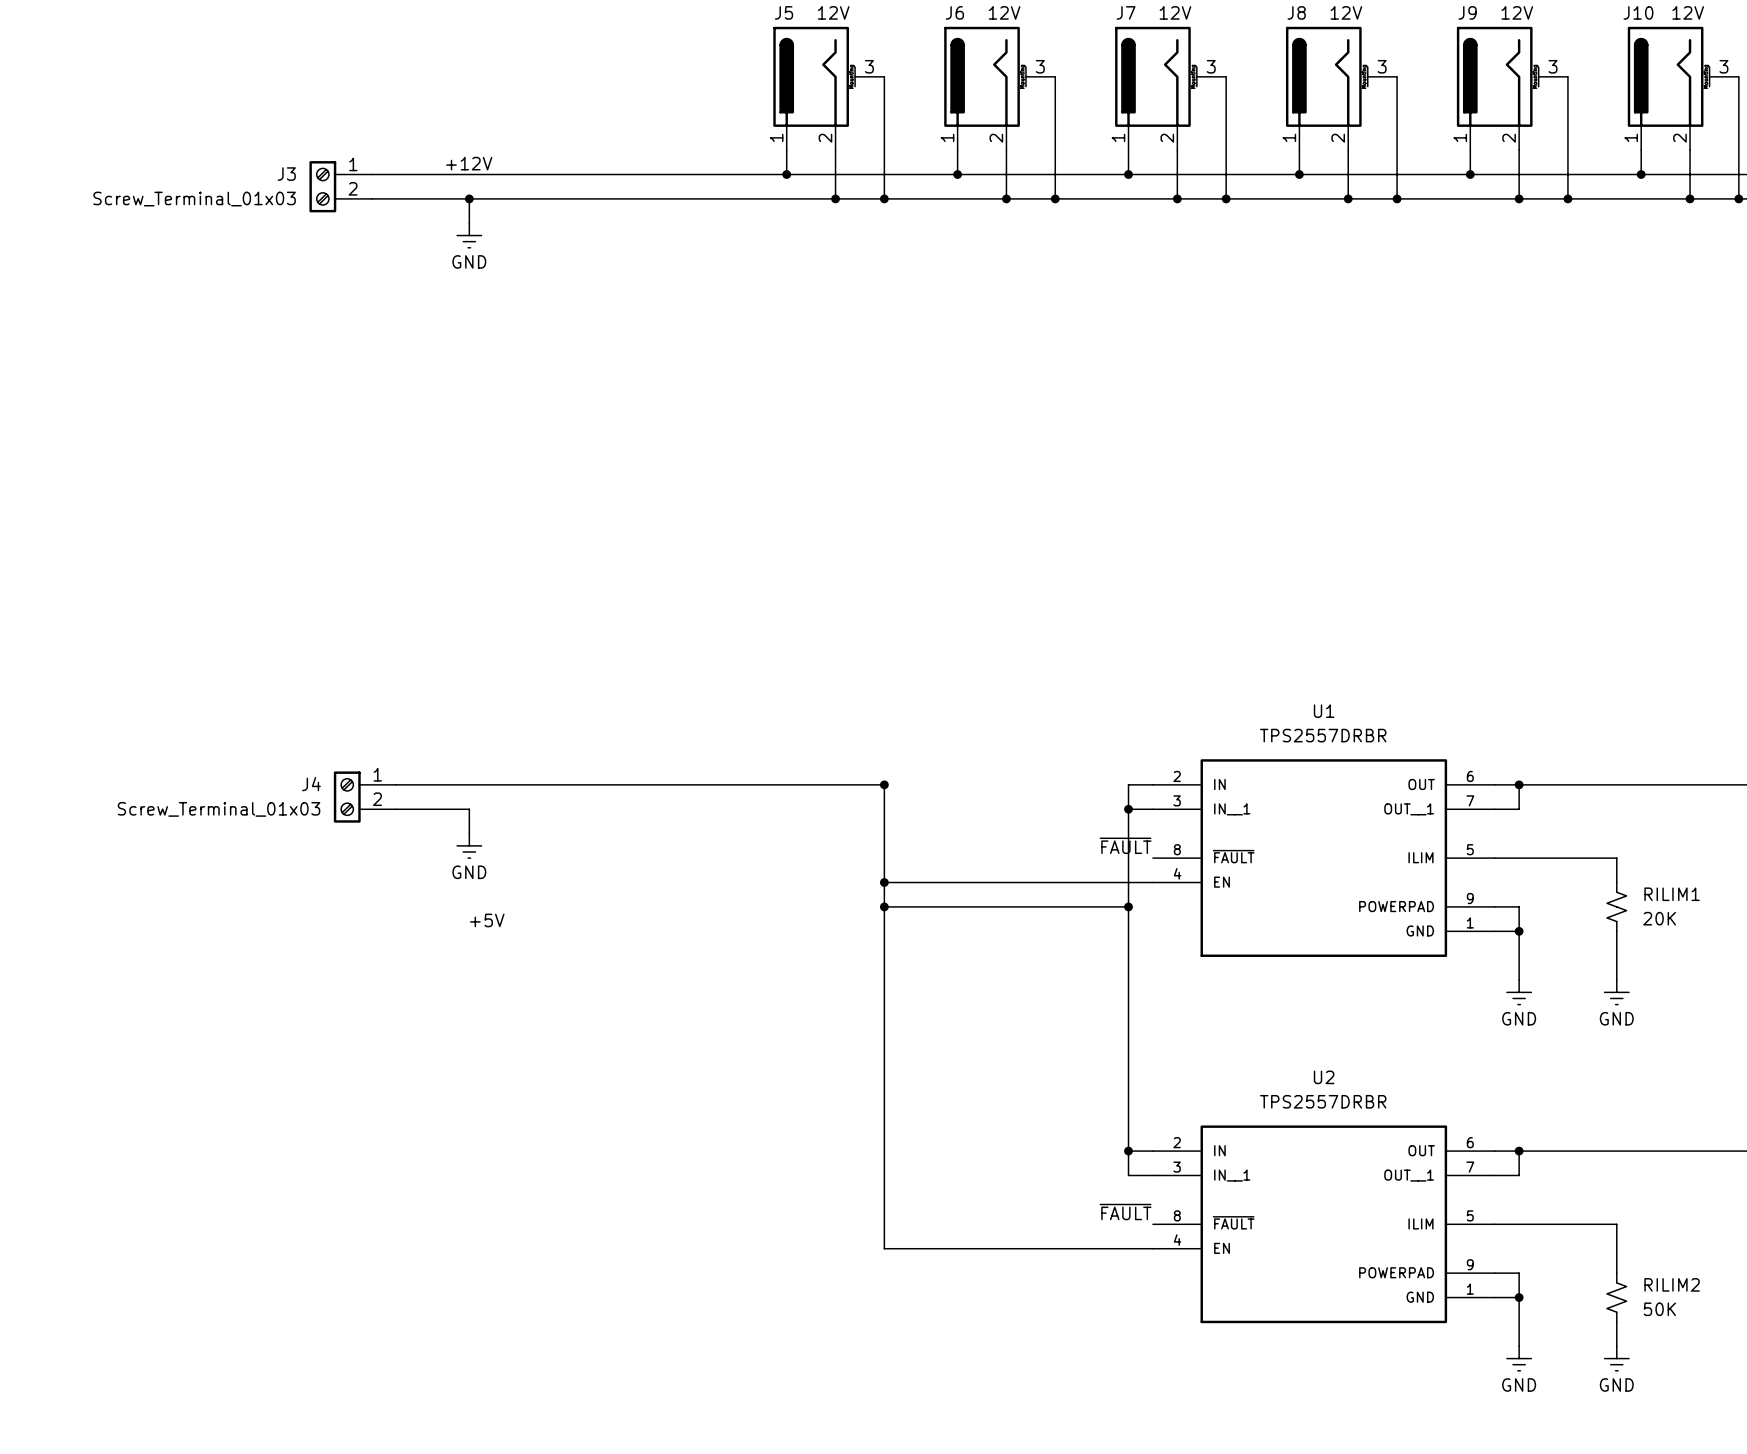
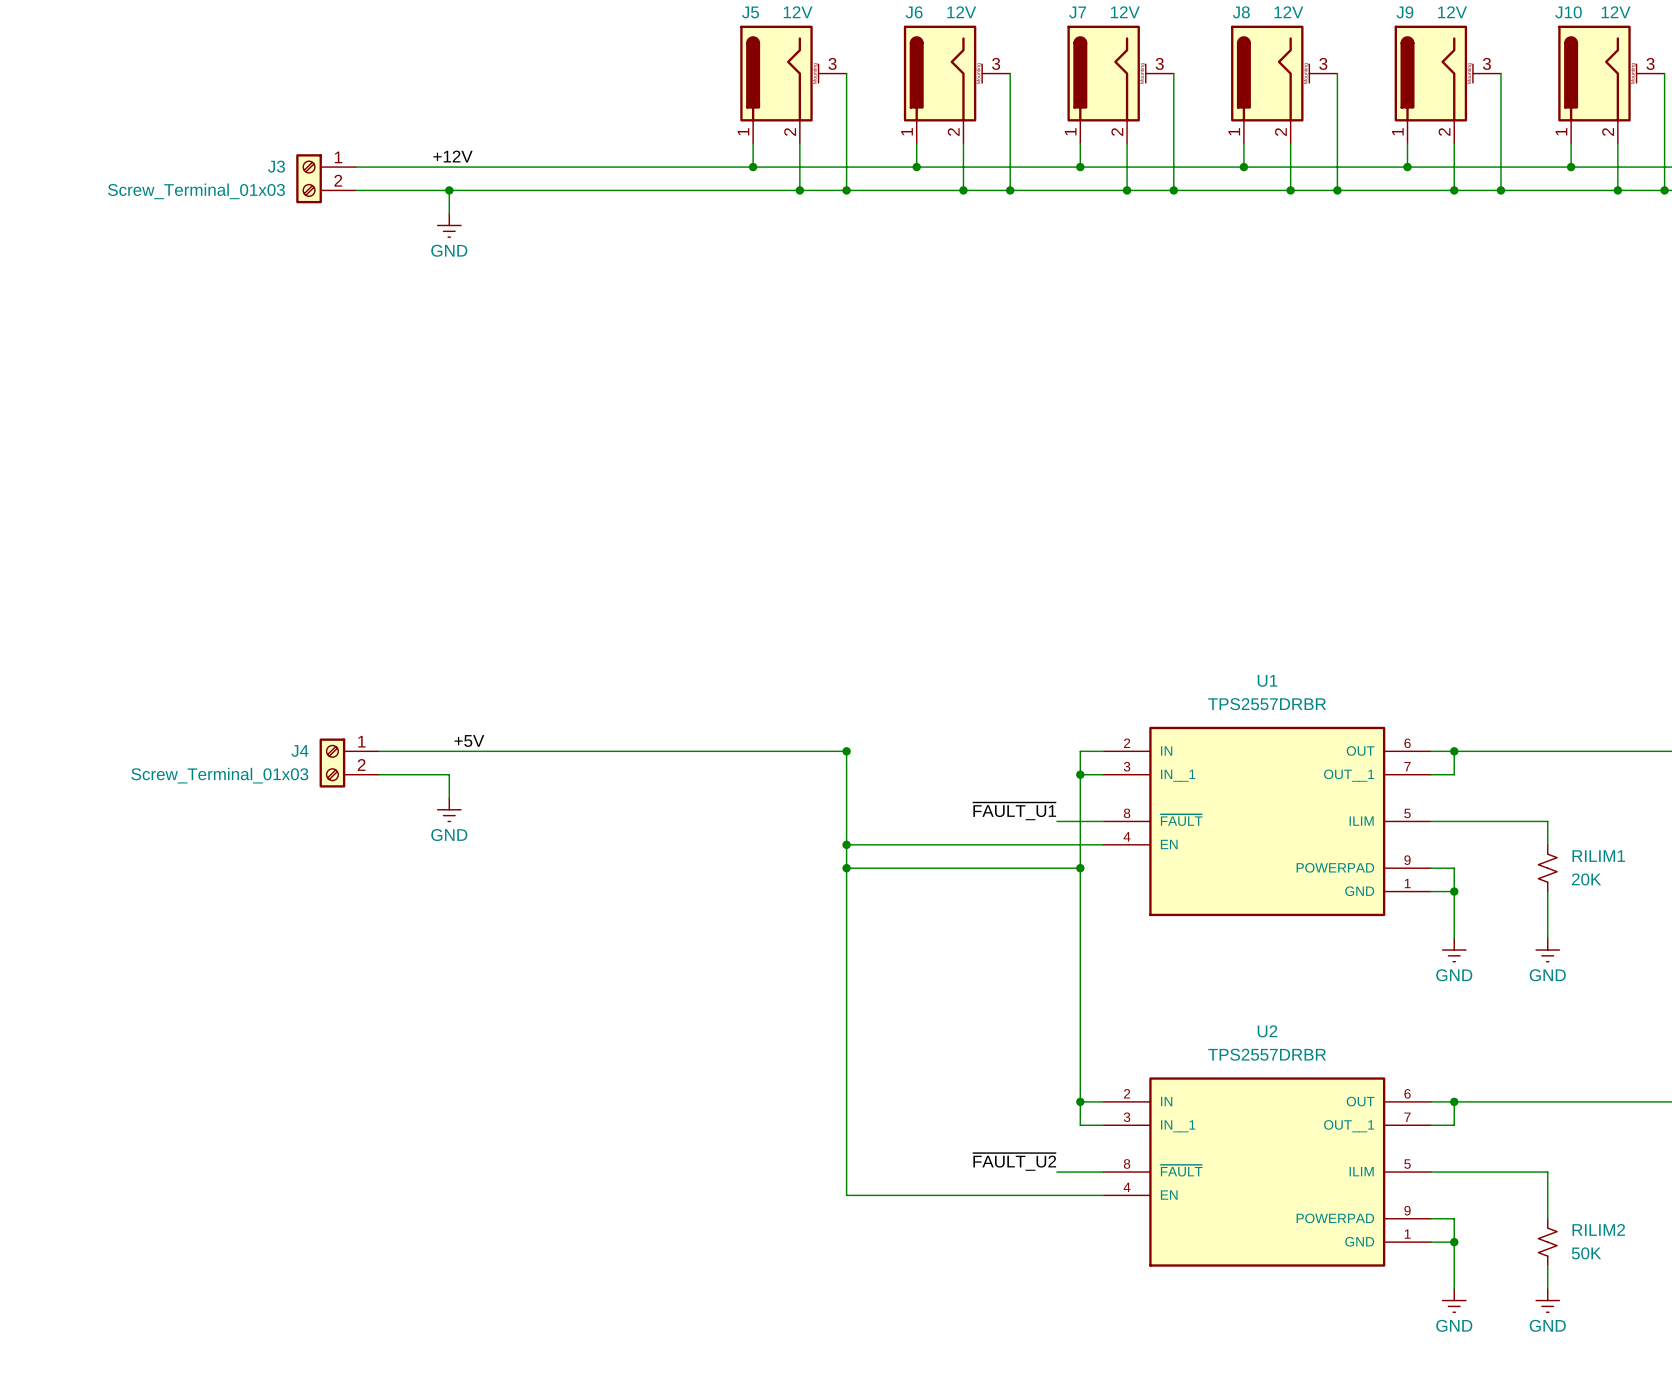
label: ~{FAULT} (1125, 845) -> ~{FAULT_U1} (1014, 811)
wire: none -> (1056, 821) (1103, 821)
label position: +5V (487, 920) -> +5V (469, 740)
label: ~{FAULT} (1125, 1212) -> ~{FAULT_U2} (1014, 1161)
wire: none -> (1056, 1172) (1103, 1172)

